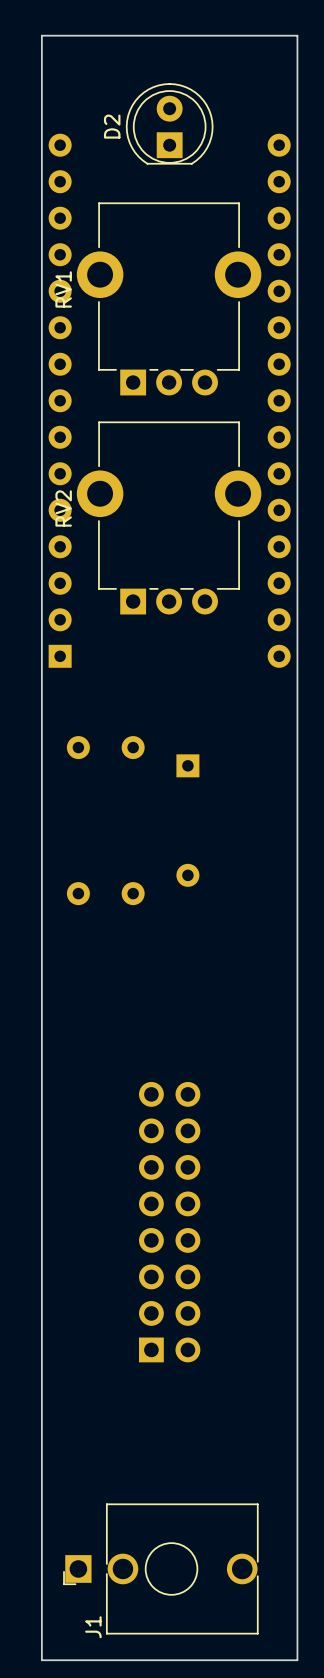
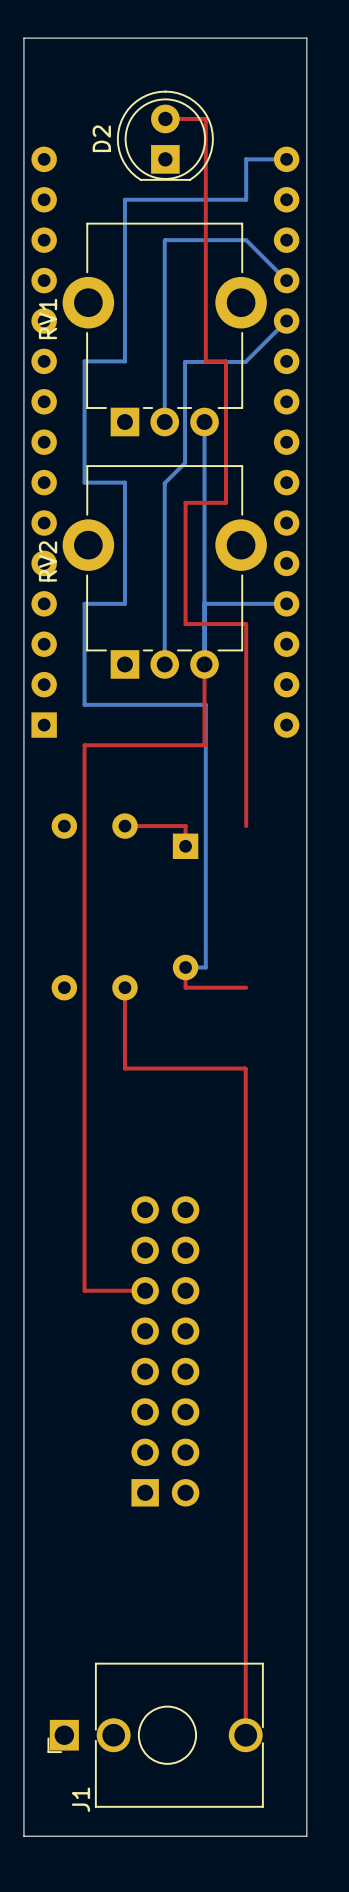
top track: none -> (165, 118) (205, 118) (205, 361) (225, 361) (225, 502) (185, 502) (185, 624) (246, 624) (246, 826)
bottom track: none -> (286, 159) (246, 159) (246, 199) (124, 199) (124, 361) (84, 361) (84, 482) (124, 482) (124, 603) (84, 603) (84, 704) (205, 704) (205, 967) (185, 967)
bottom track: none -> (286, 280) (246, 240) (164, 240) (164, 422)
bottom track: none -> (286, 320) (245, 361) (185, 361) (185, 462) (164, 483) (164, 664)
bottom track: none -> (204, 422) (204, 664)
bottom track: none -> (286, 603) (204, 605)
top track: none -> (204, 664) (205, 745) (84, 745) (84, 1290) (145, 1290)
top track: none -> (124, 826) (185, 826) (185, 846)
top track: none -> (185, 967) (185, 987) (246, 987)
top track: none -> (124, 987) (124, 1068) (245, 1068) (245, 1735)

